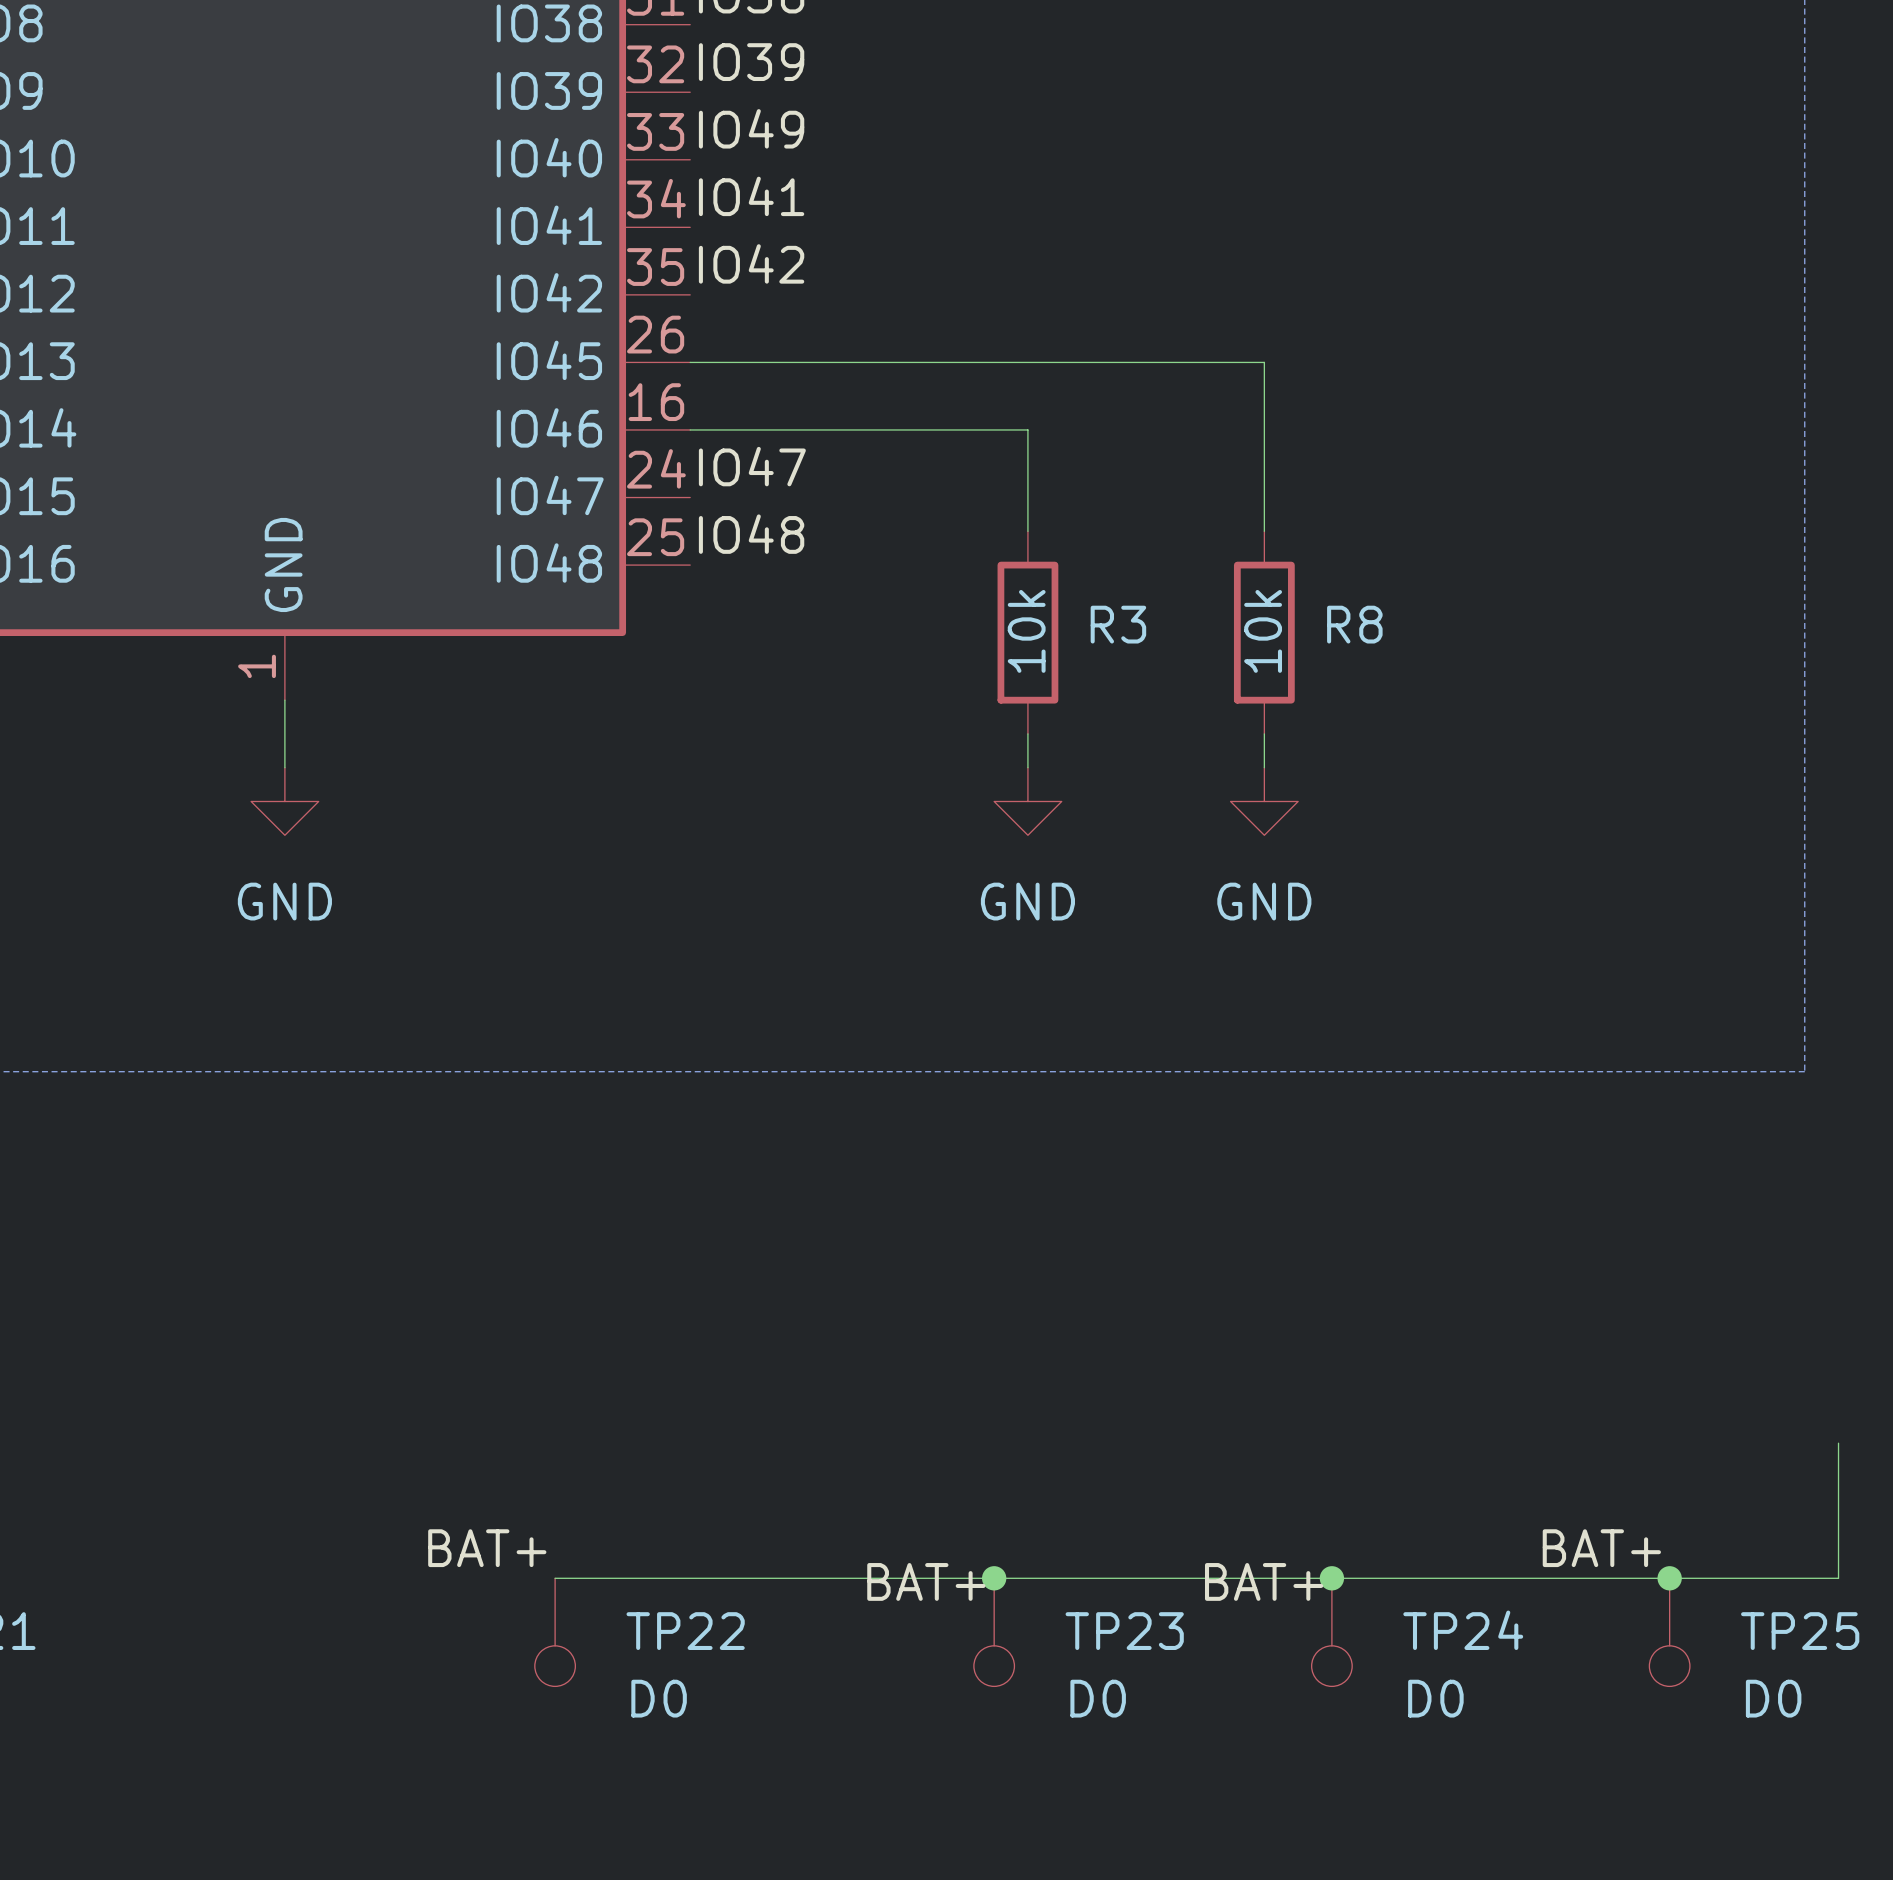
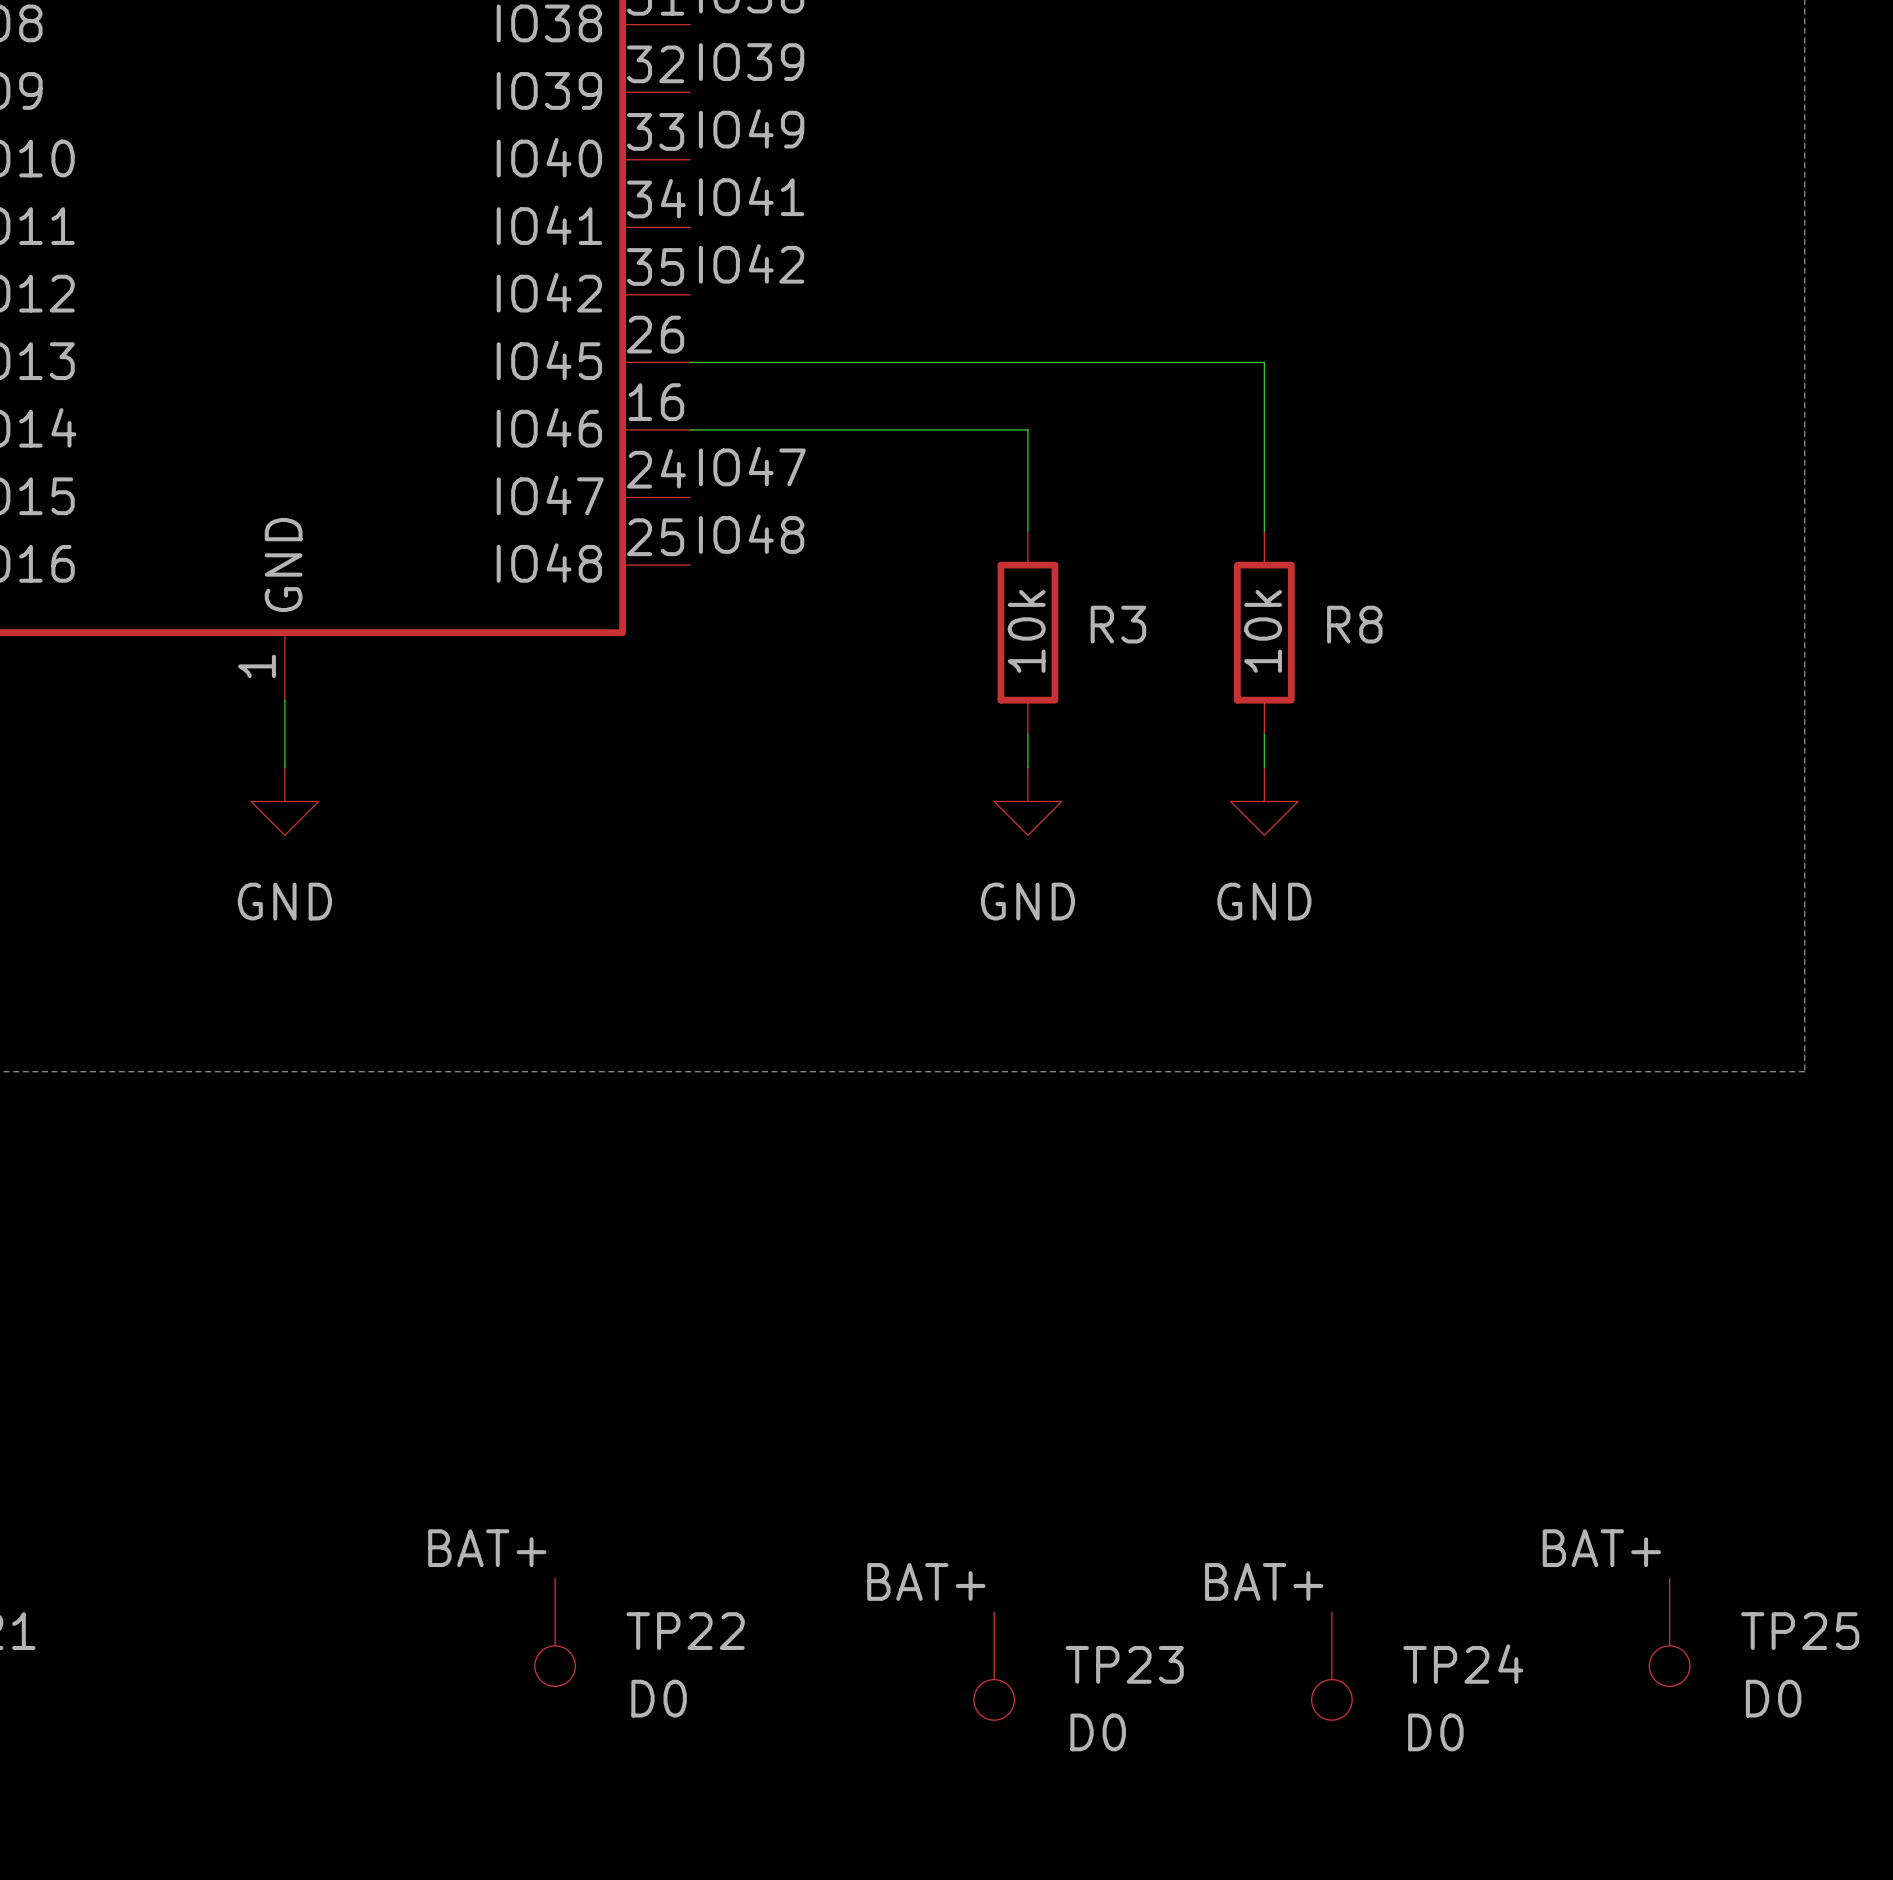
wire: (1838, 1443) (1838, 1578) (555, 1578) -> none
junction: (994, 1578) -> none
junction: (1331, 1578) -> none
junction: (1669, 1578) -> none
TP23 position: (994, 1632) -> (994, 1666)
TP24 position: (1331, 1632) -> (1331, 1666)

